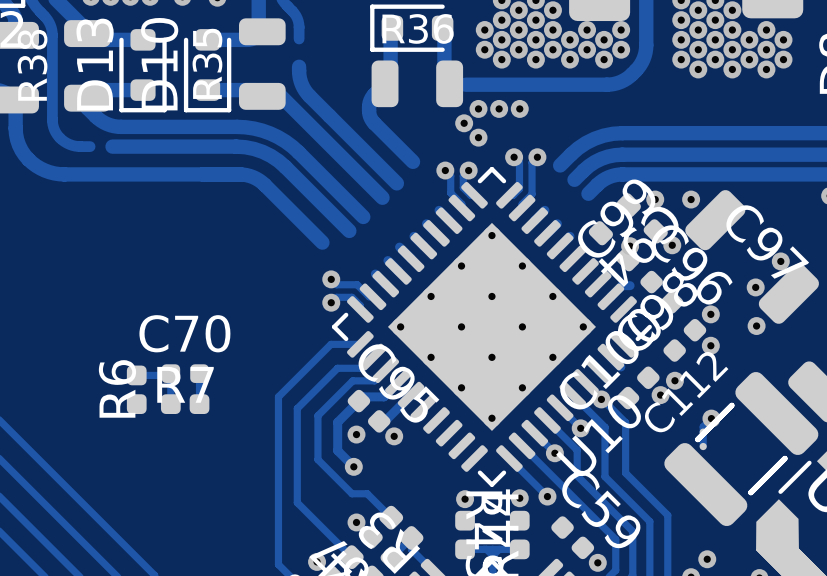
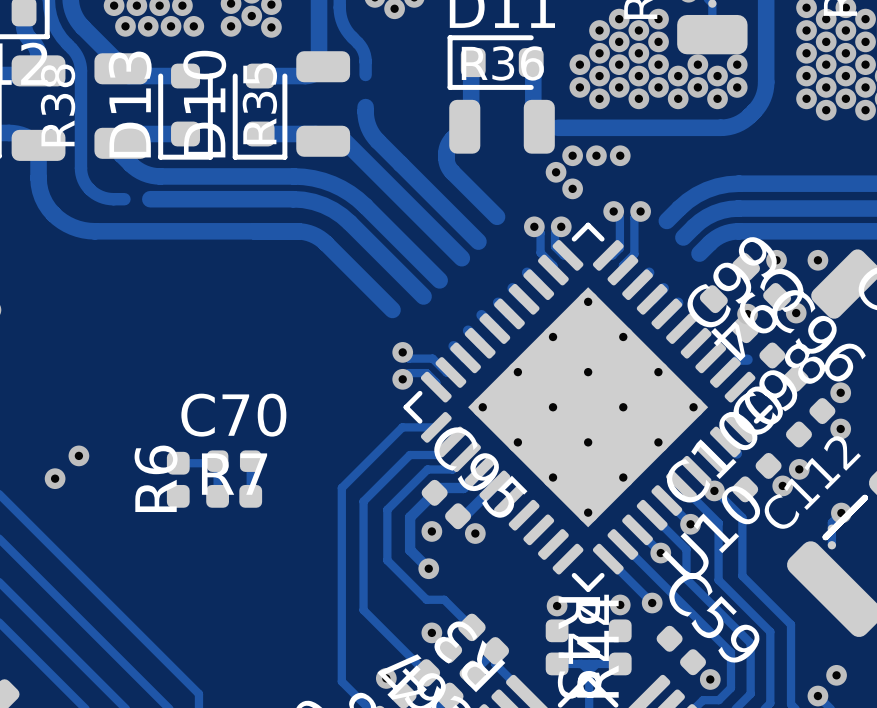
via: none -> (78, 455)
via: none -> (55, 478)

